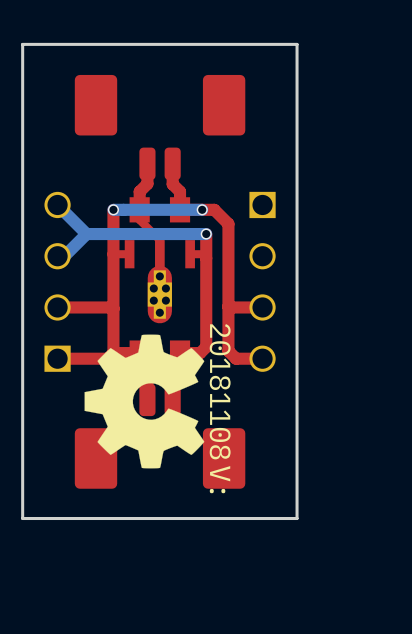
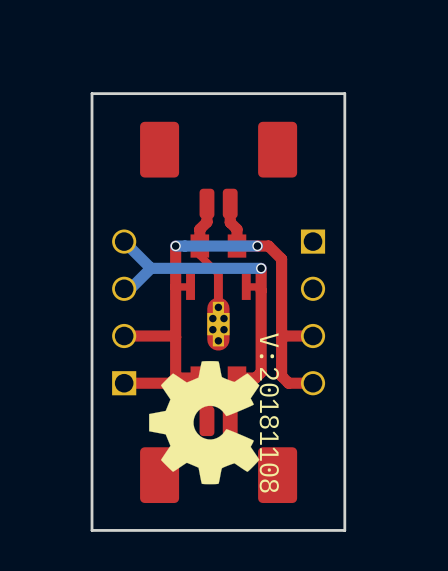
drawing shape: [209, 324, 231, 494] -> [259, 333, 279, 493]

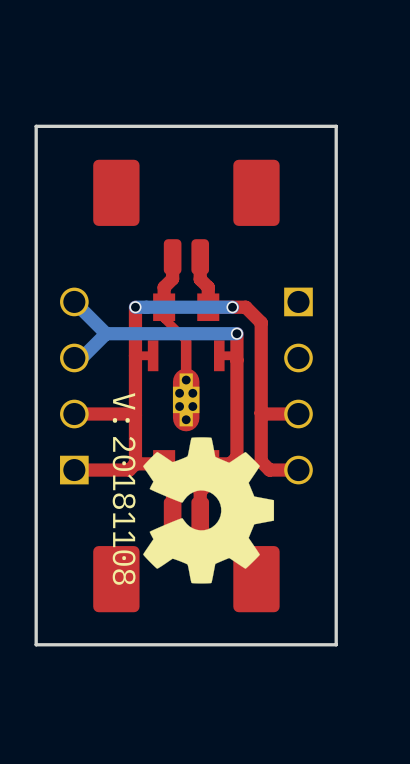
drawing: none -> [143, 437, 275, 584]
drawing: [149, 361, 260, 485] -> none

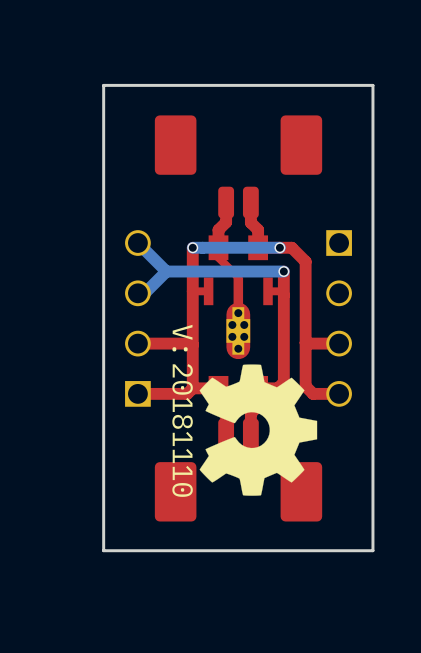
drawing shape: [112, 393, 136, 585] -> [172, 324, 193, 497]

